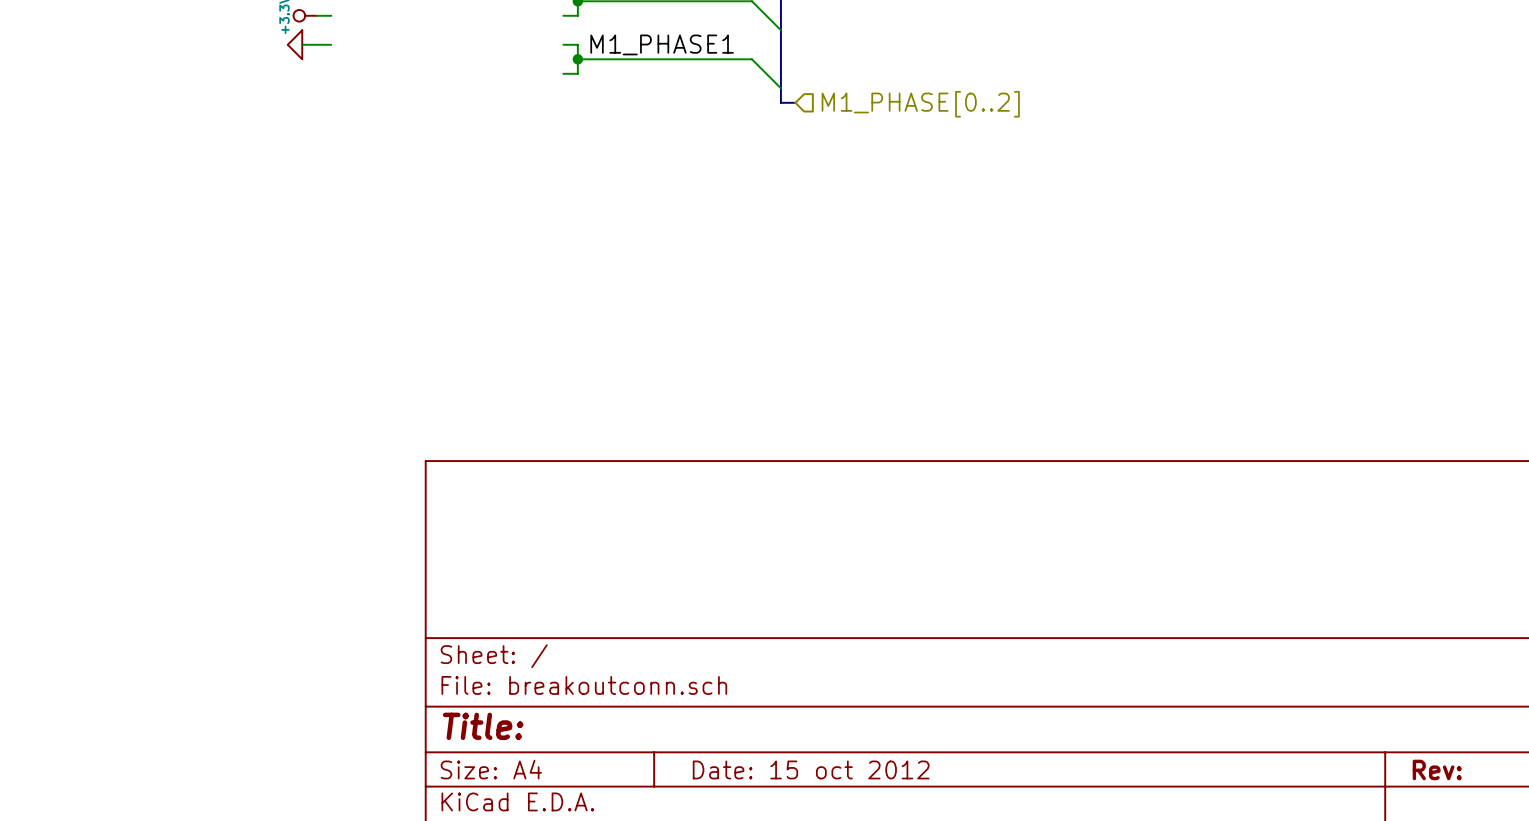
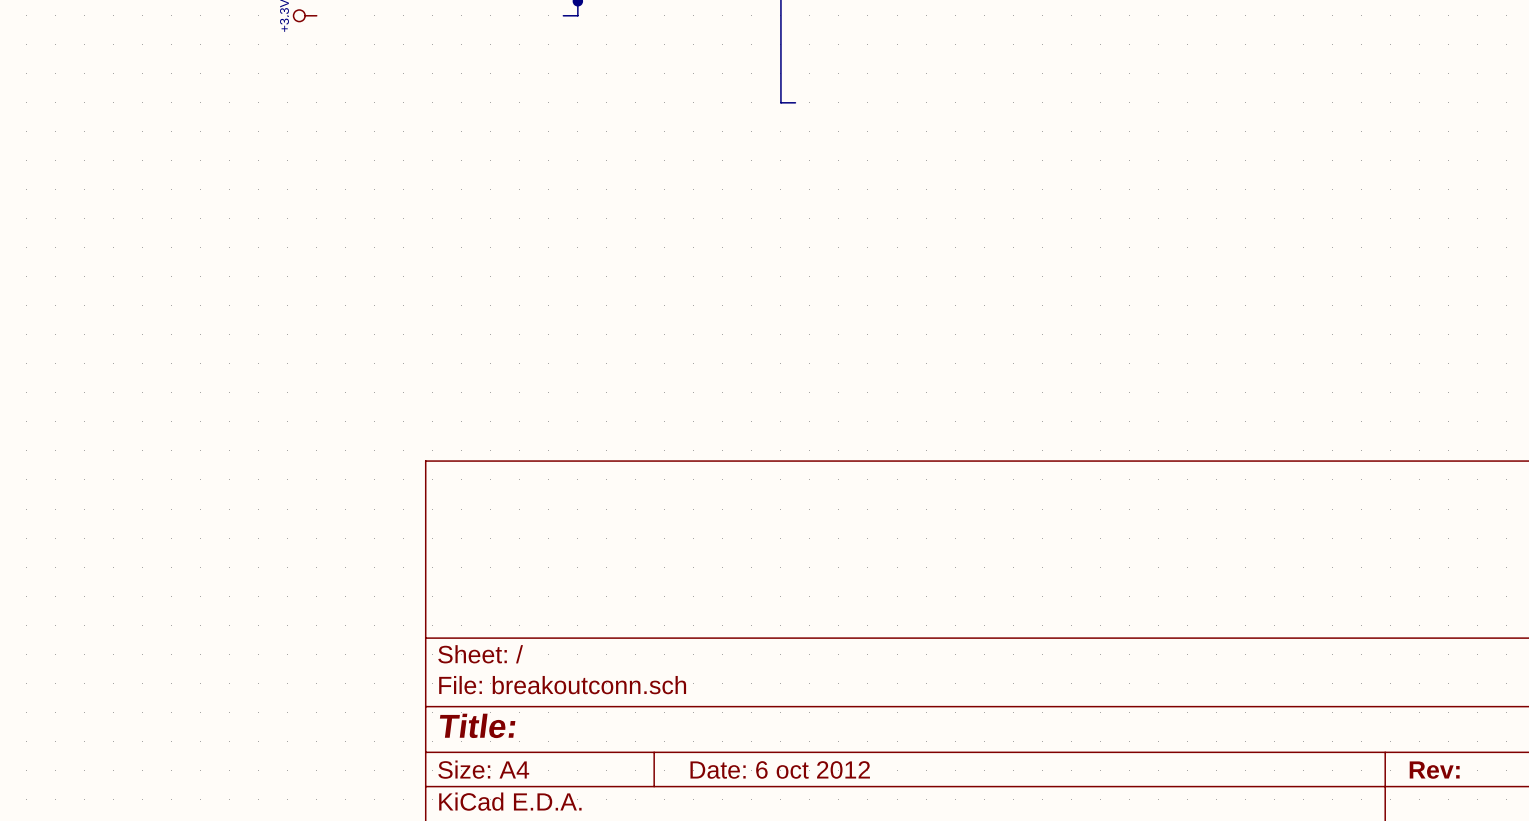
wire: (577, 1) (751, 1) (780, 30) -> none
wire: (316, 15) (331, 15) -> none
power symbol: (294, 44) -> none
wire: (302, 44) (331, 44) -> none
wire: (563, 44) (577, 44) (577, 73) (563, 73) -> none
label: M1_PHASE1 (662, 44) -> none
wire: (577, 59) (751, 59) (780, 88) -> none
junction: (577, 59) -> none
hierarchical label: M1_PHASE[0..2] (920, 104) -> none
title block: Date: 15 oct 2012 (811, 769) -> Date: 6 oct 2012 (780, 769)

